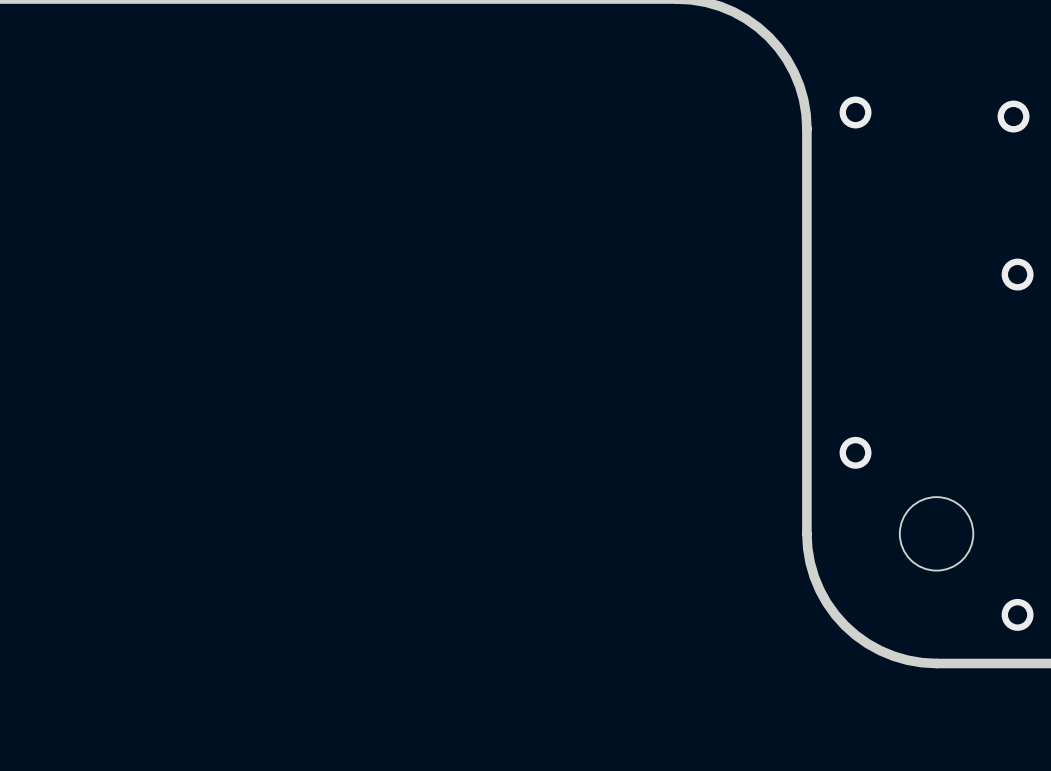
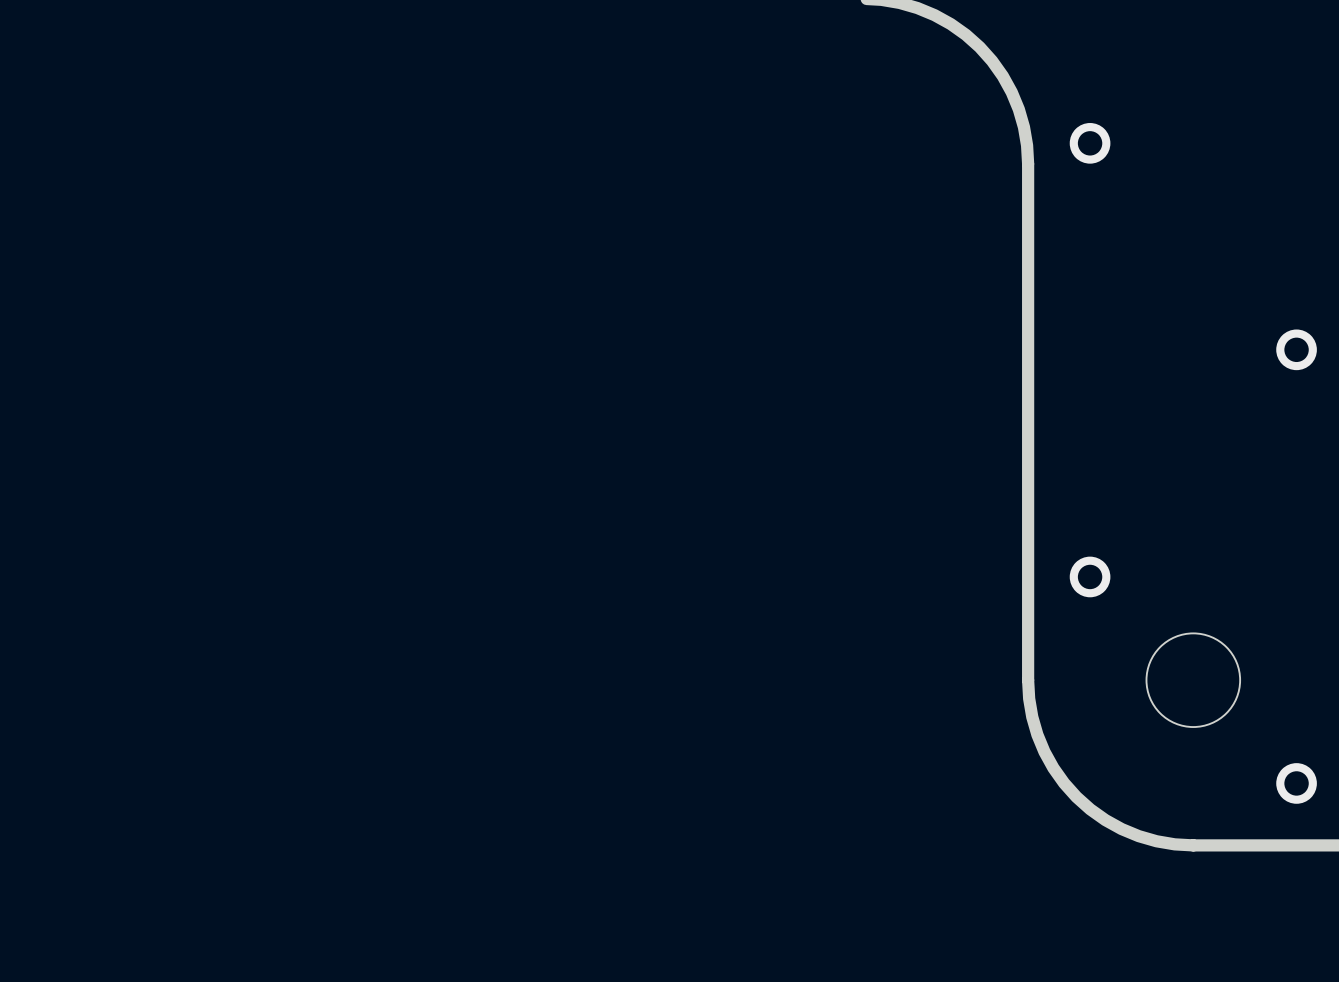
via: (1013, 116) -> none

